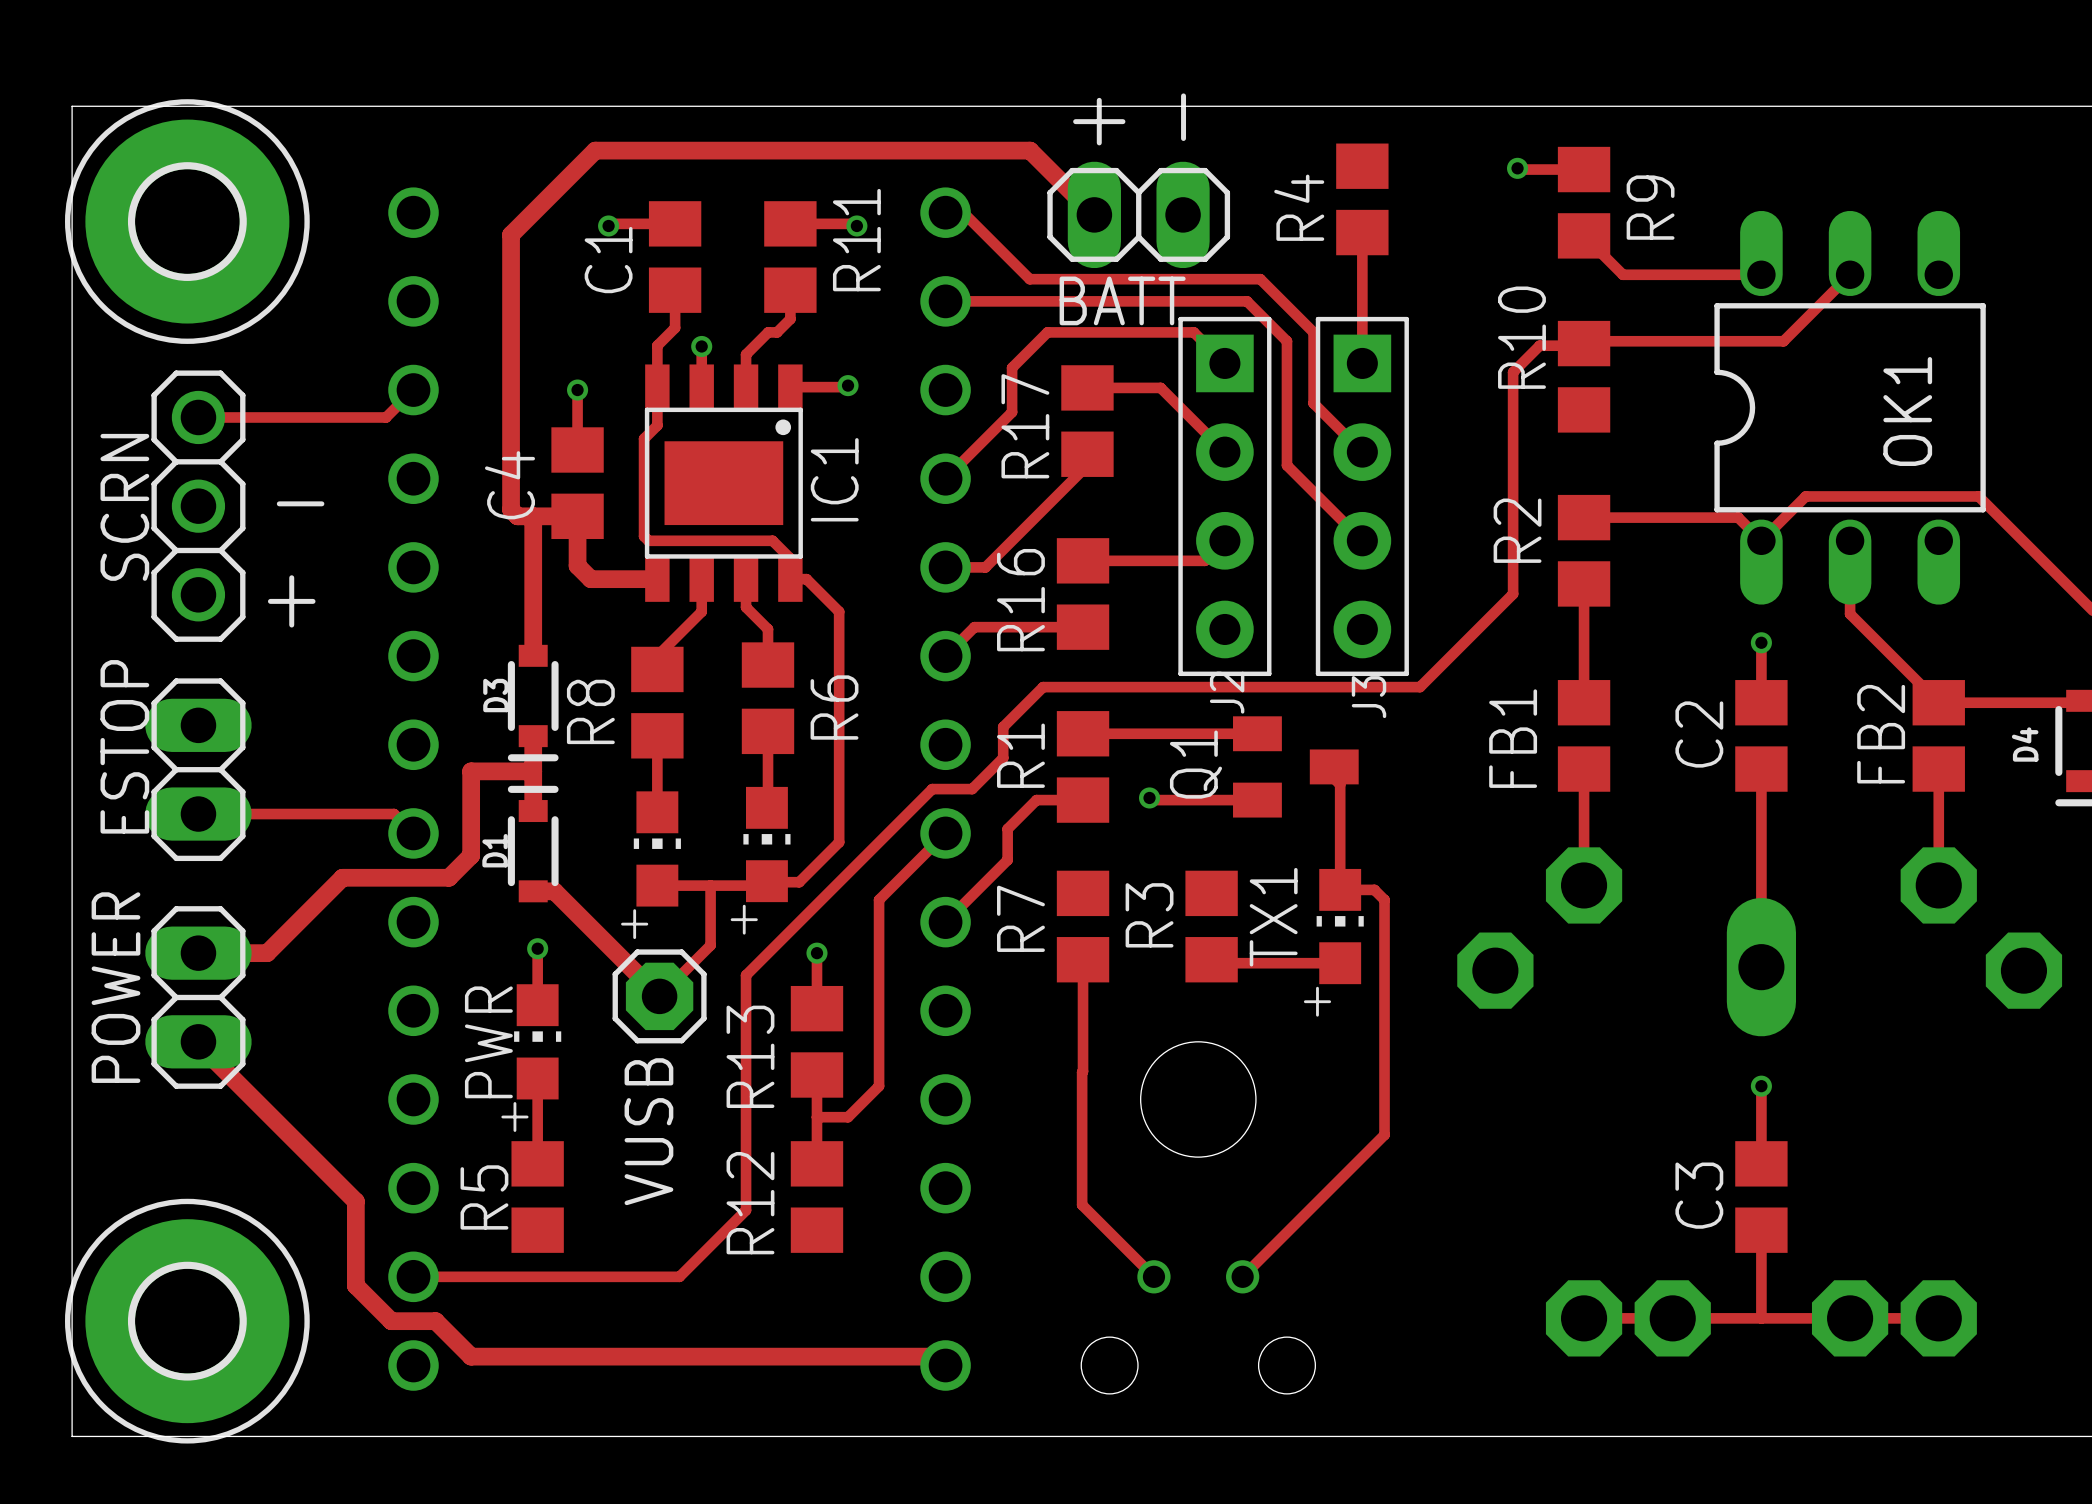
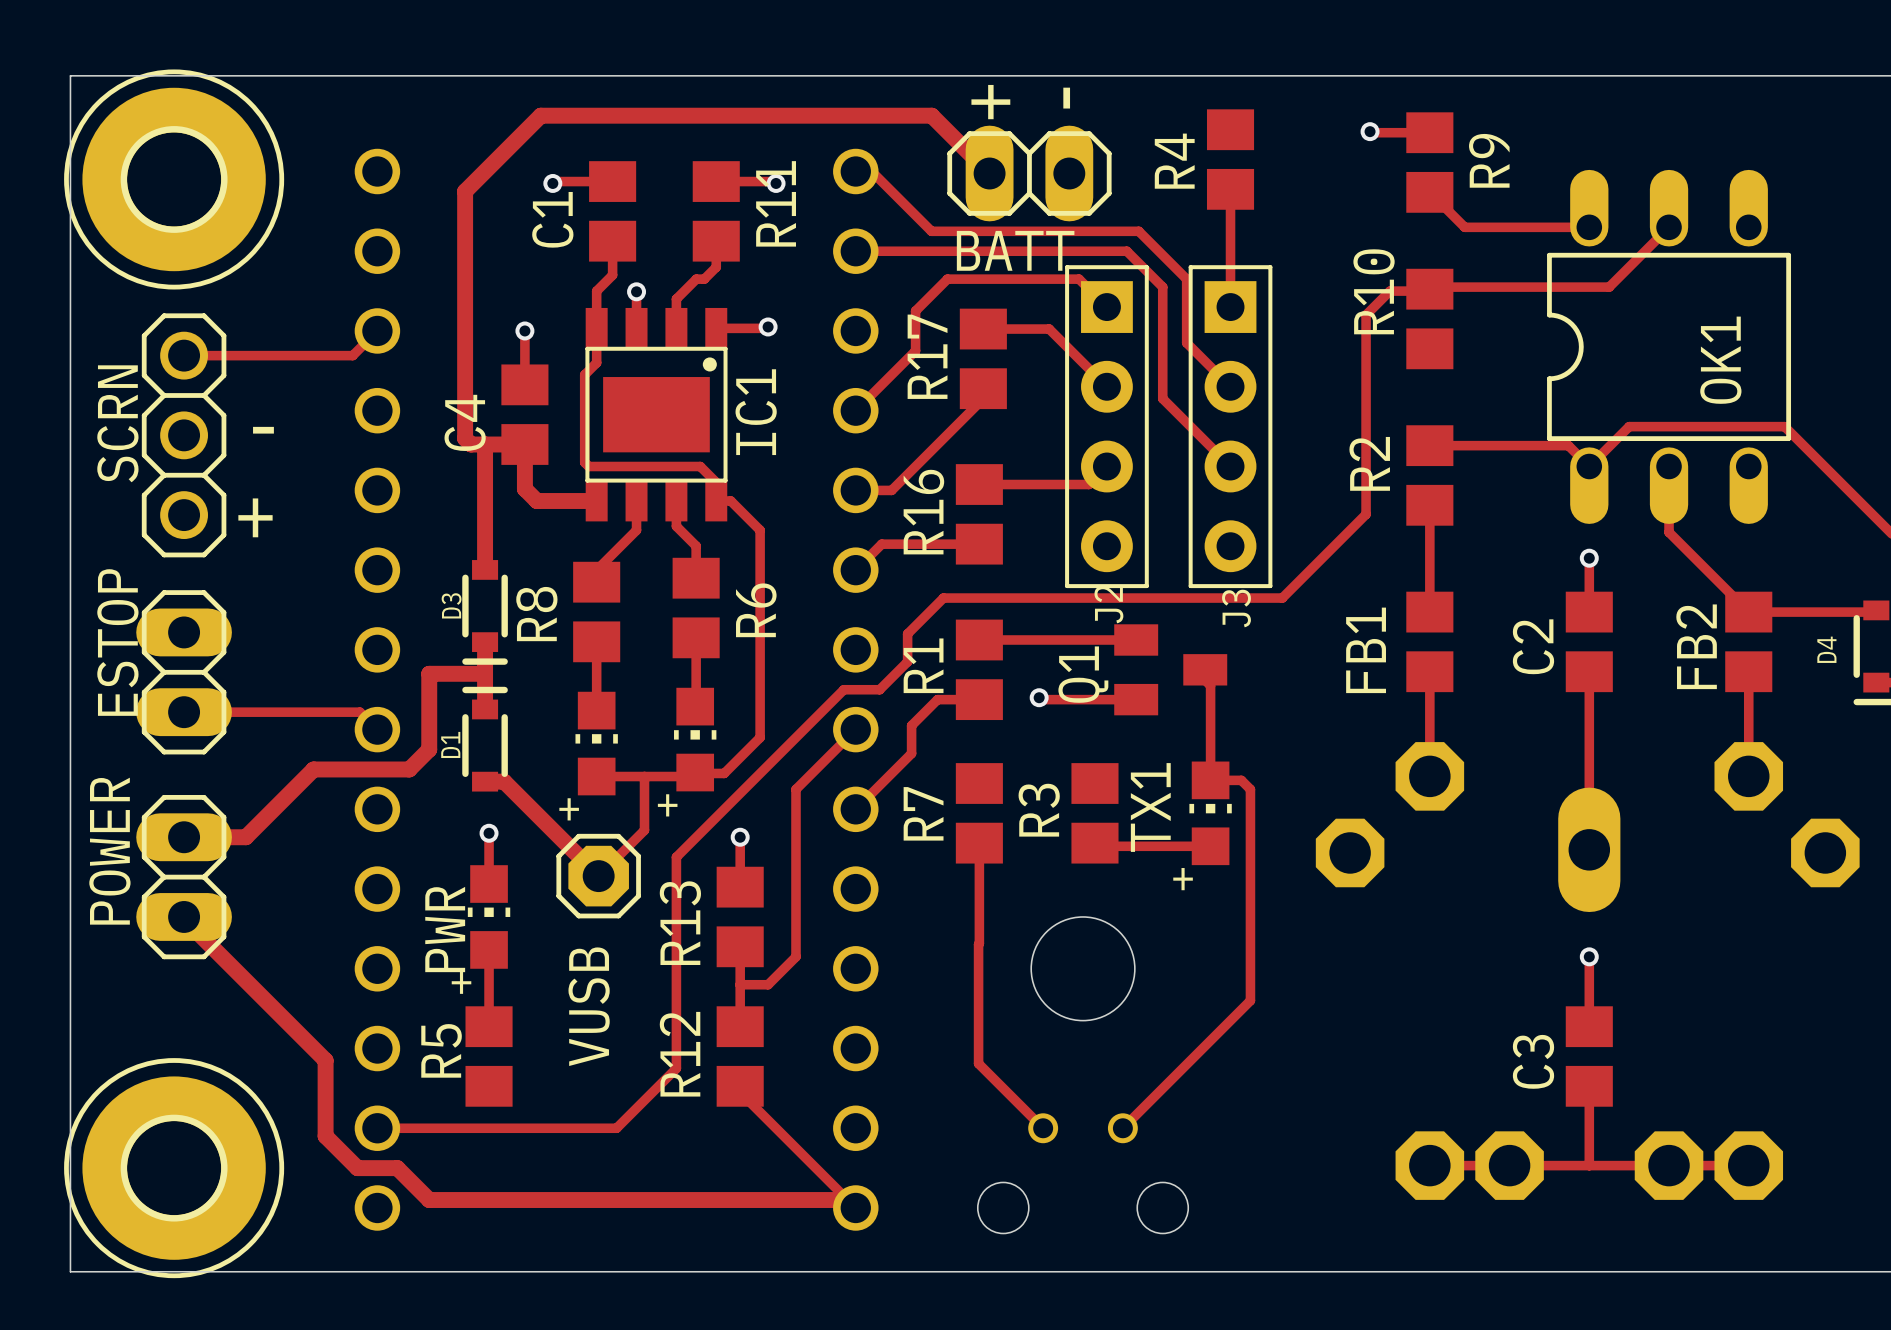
top track: none -> (740, 1086) (740, 1092) (855, 1207)

